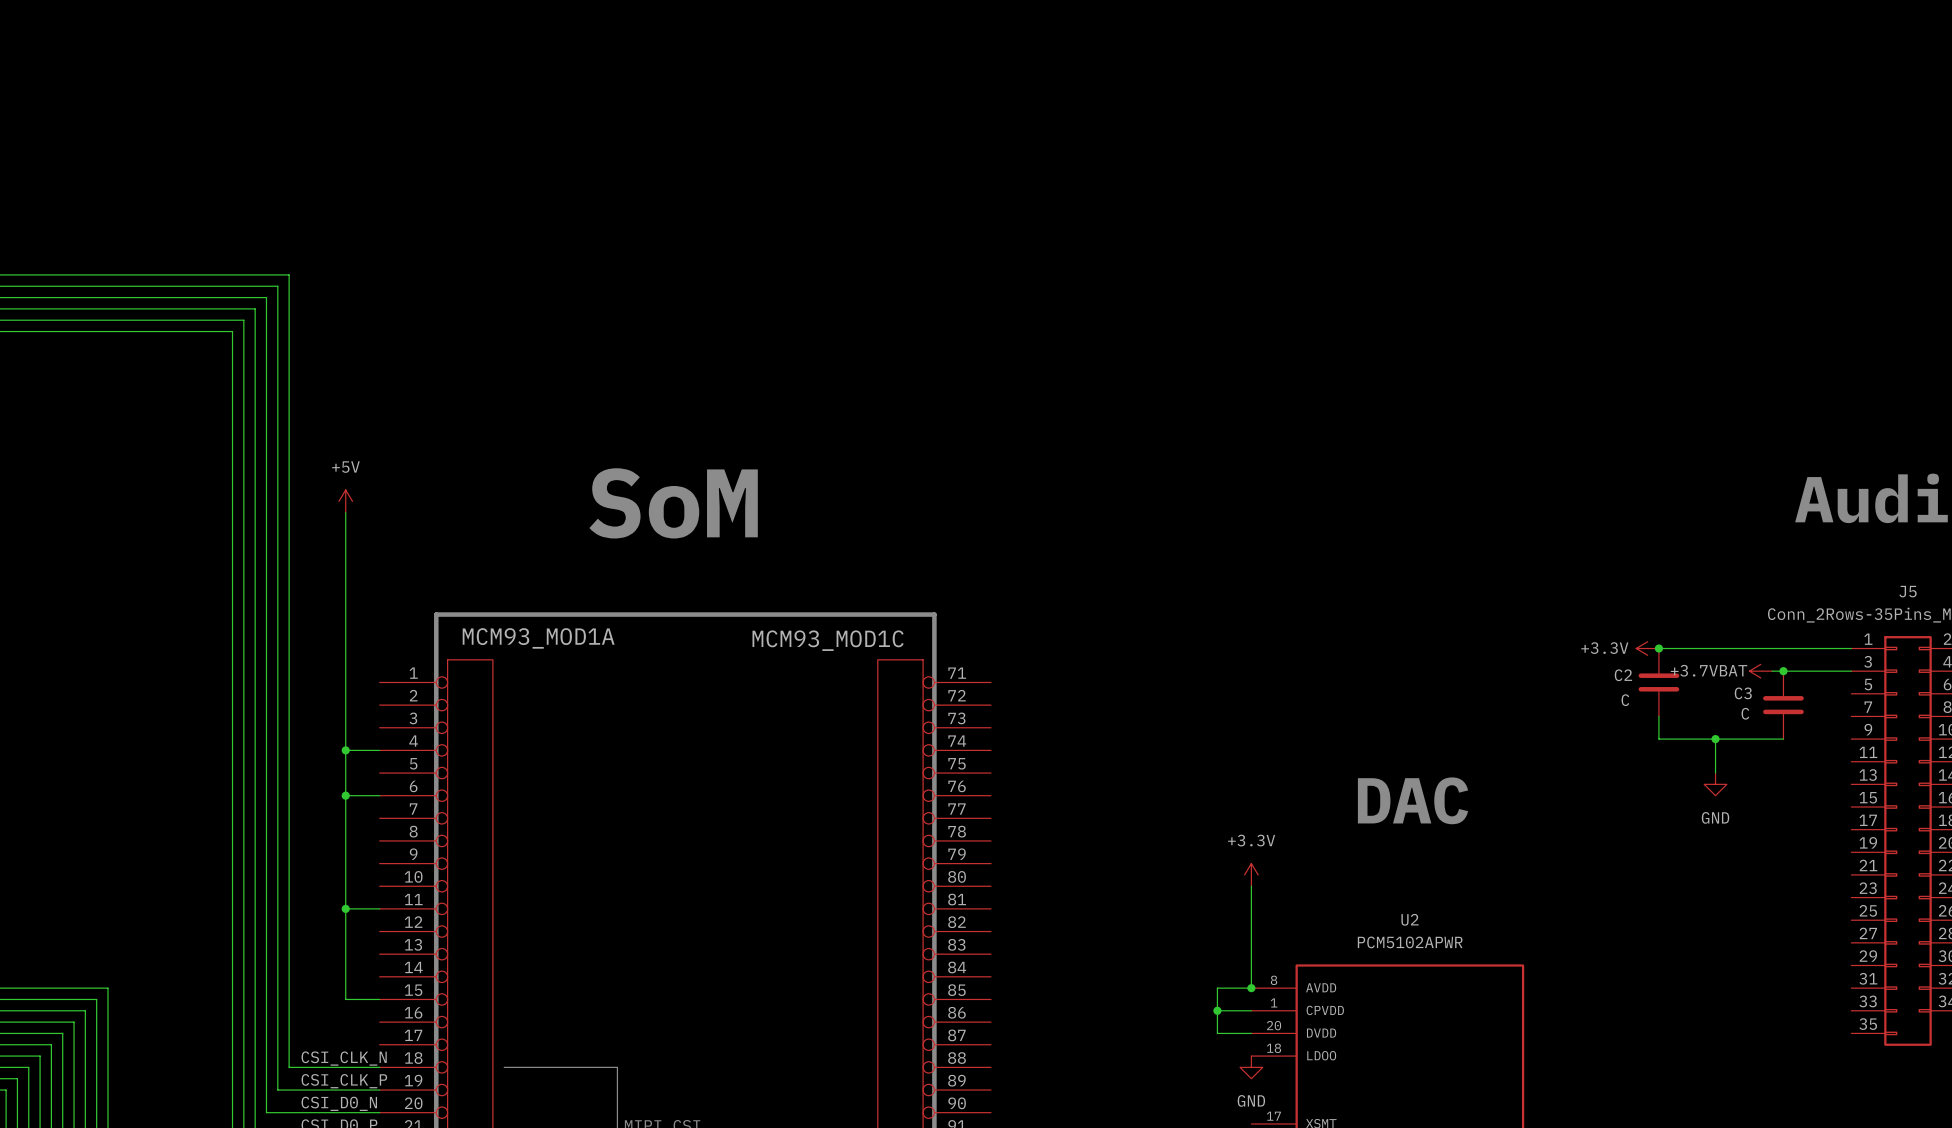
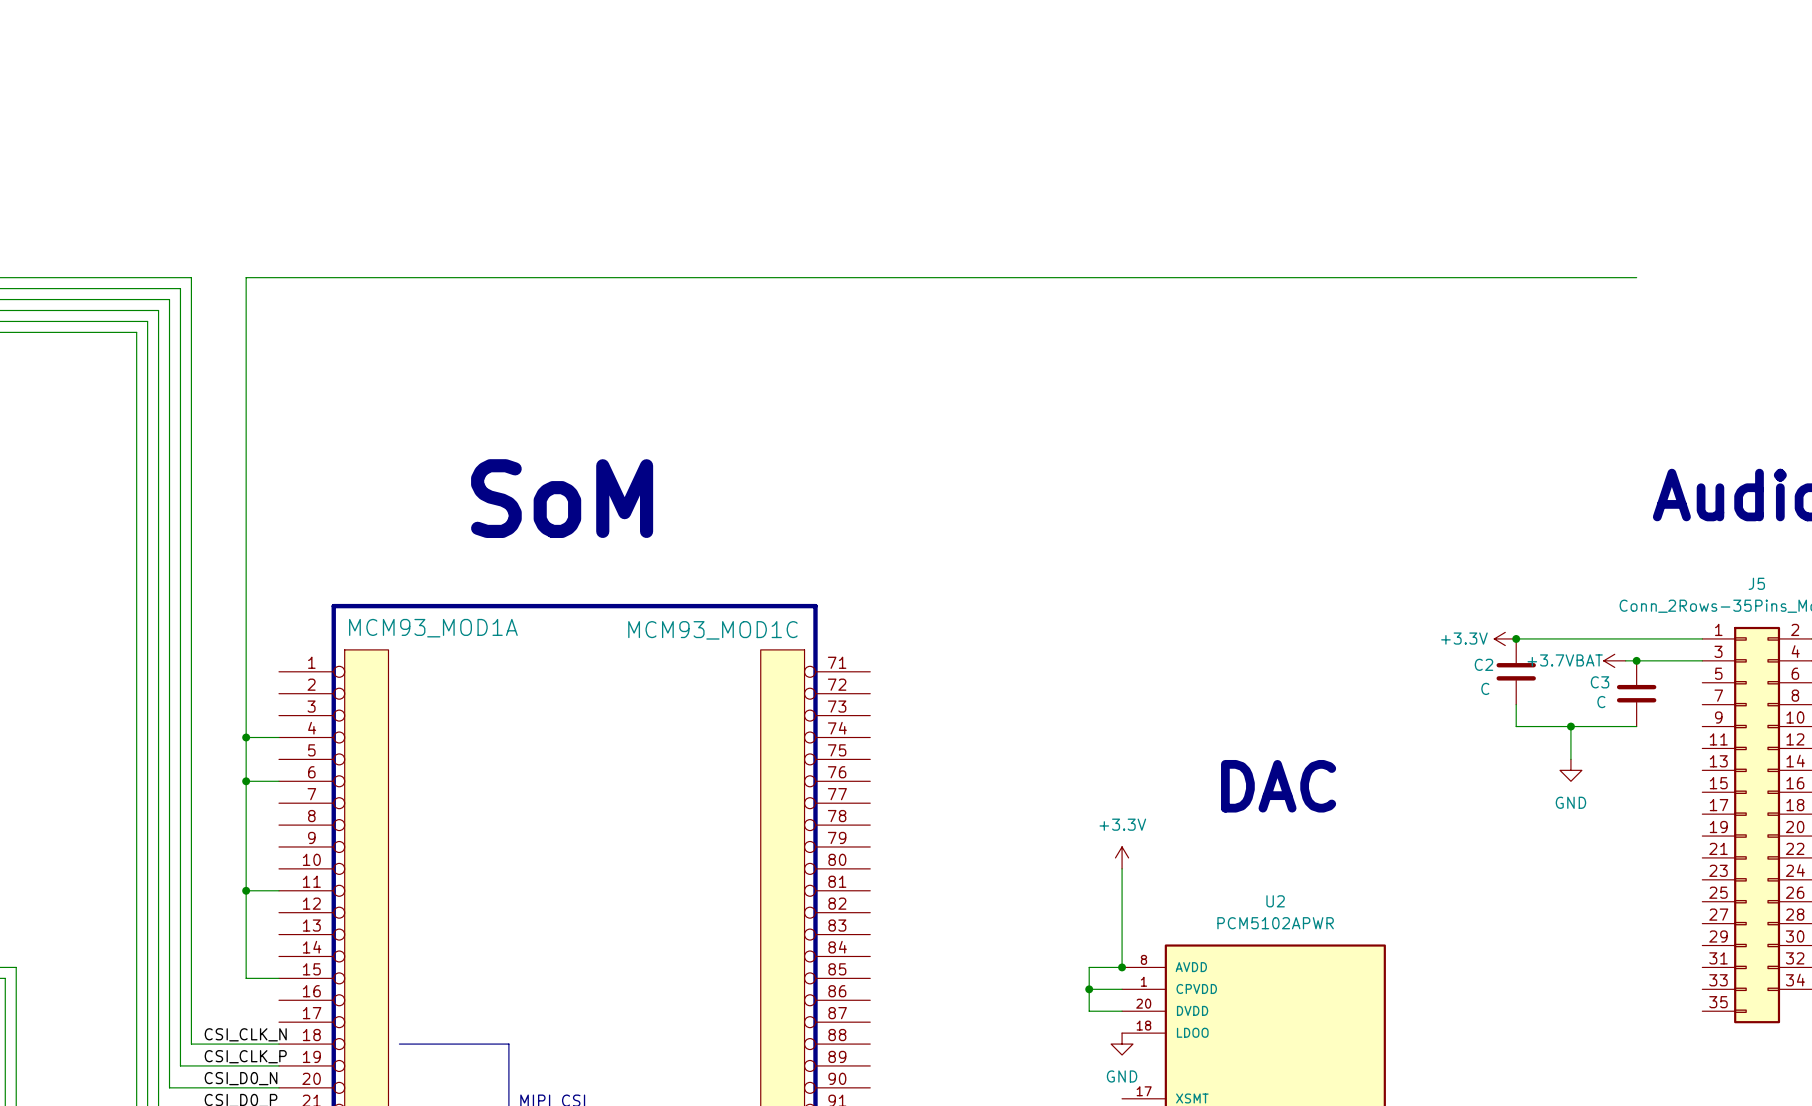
wire: none -> (1636, 277) (246, 277) (246, 507)
power symbol: +5V (345, 501) -> none

